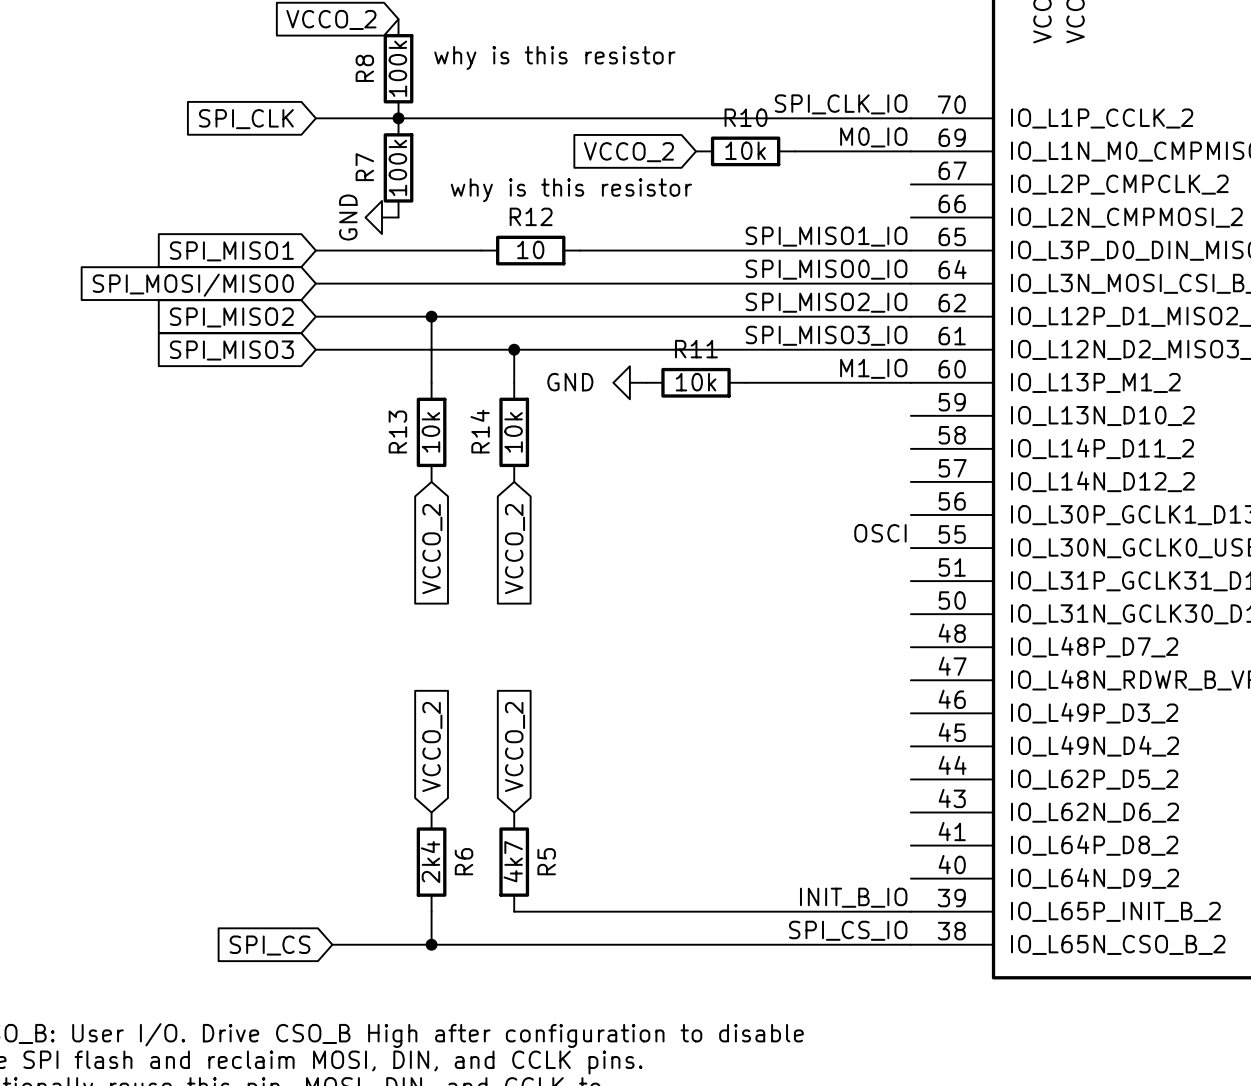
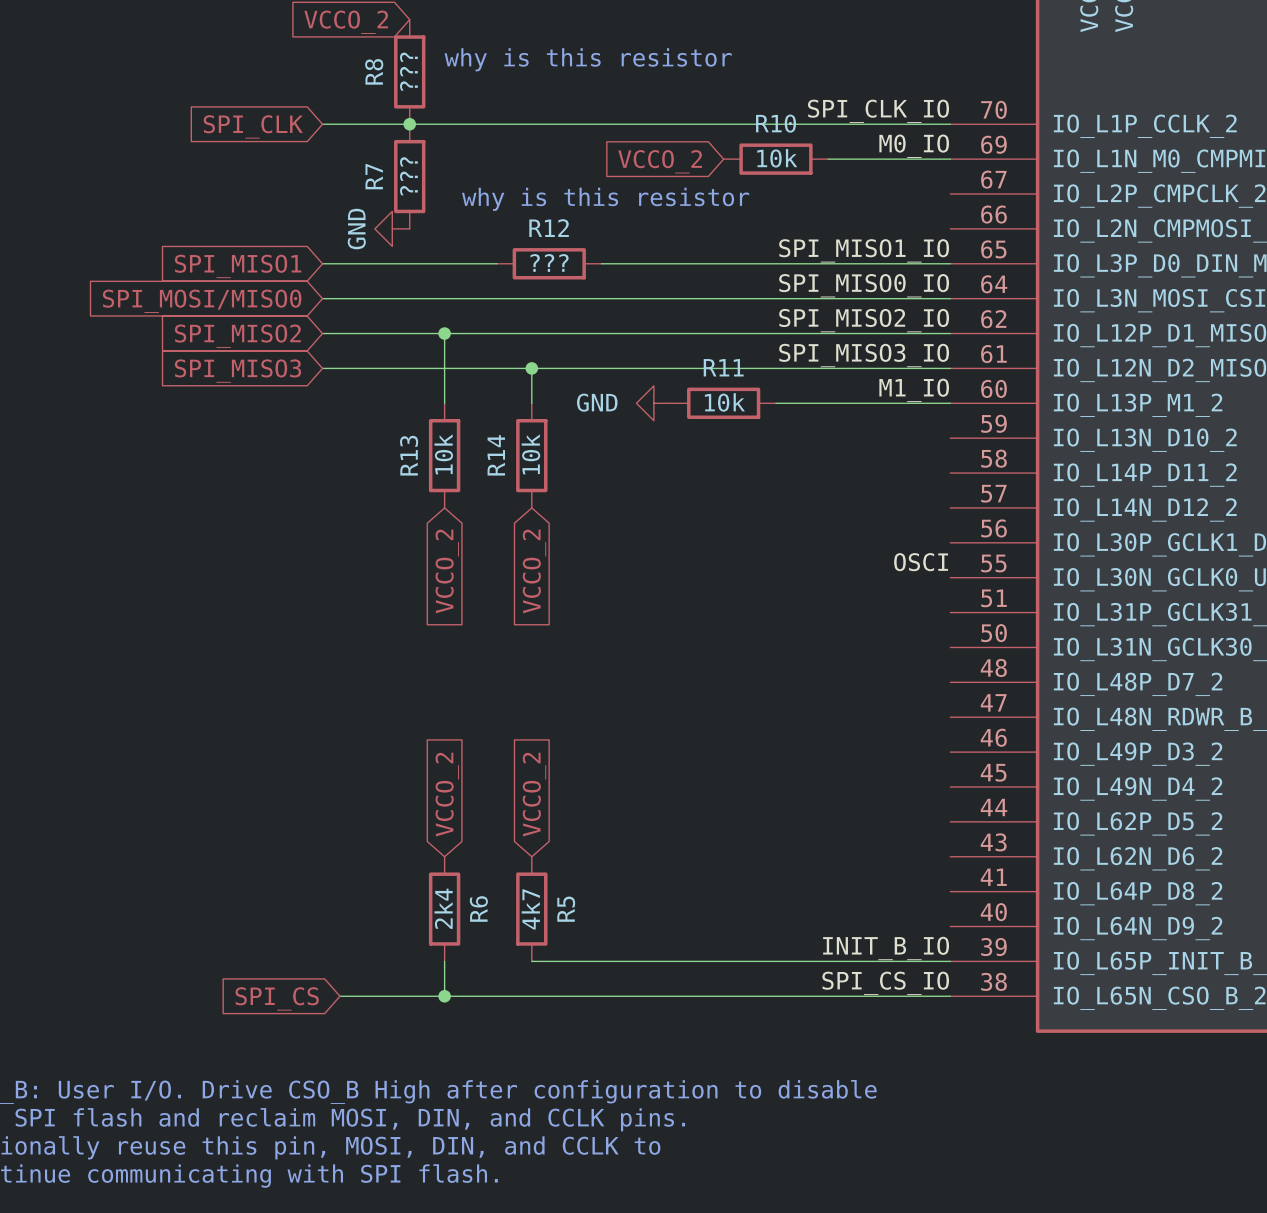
R8 value: 100k (397, 68) -> ??? (408, 71)
R7 value: 100k (397, 167) -> ??? (408, 176)
R12 value: 10 (530, 249) -> ??? (549, 262)

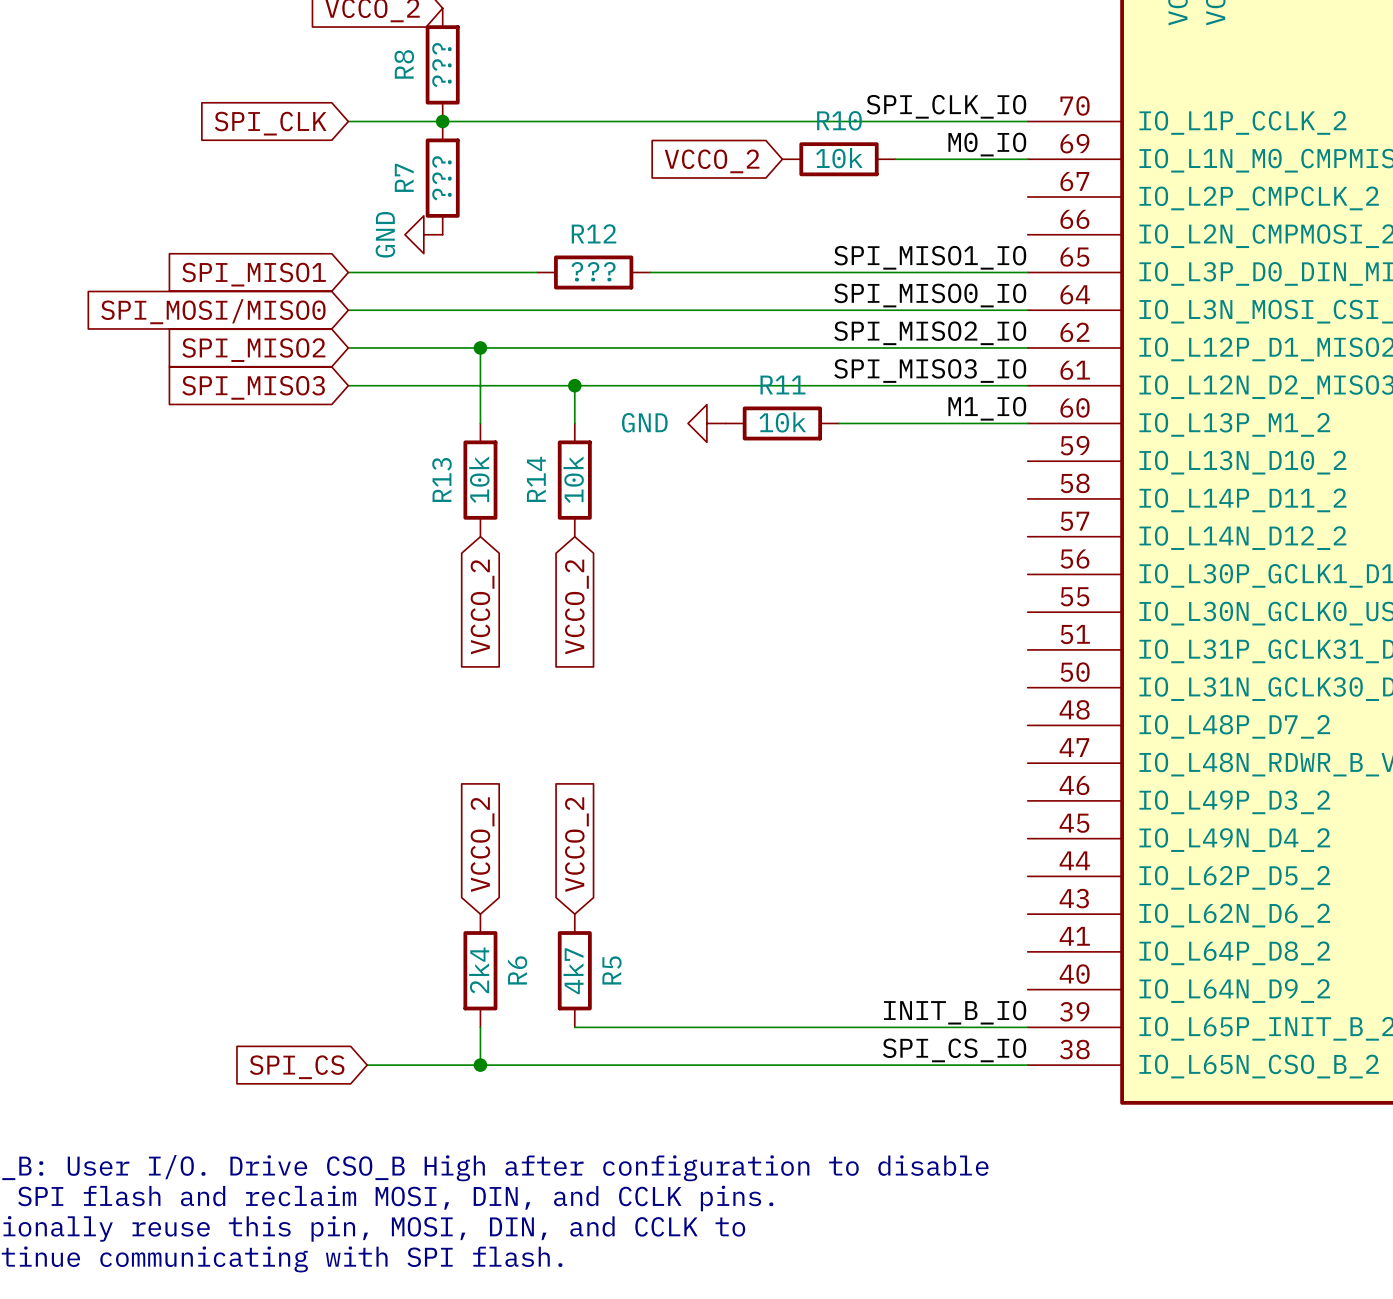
text: why is this resistor (588, 59) -> none
text: why is this resistor (605, 199) -> none
label: OSCI (921, 562) -> none

